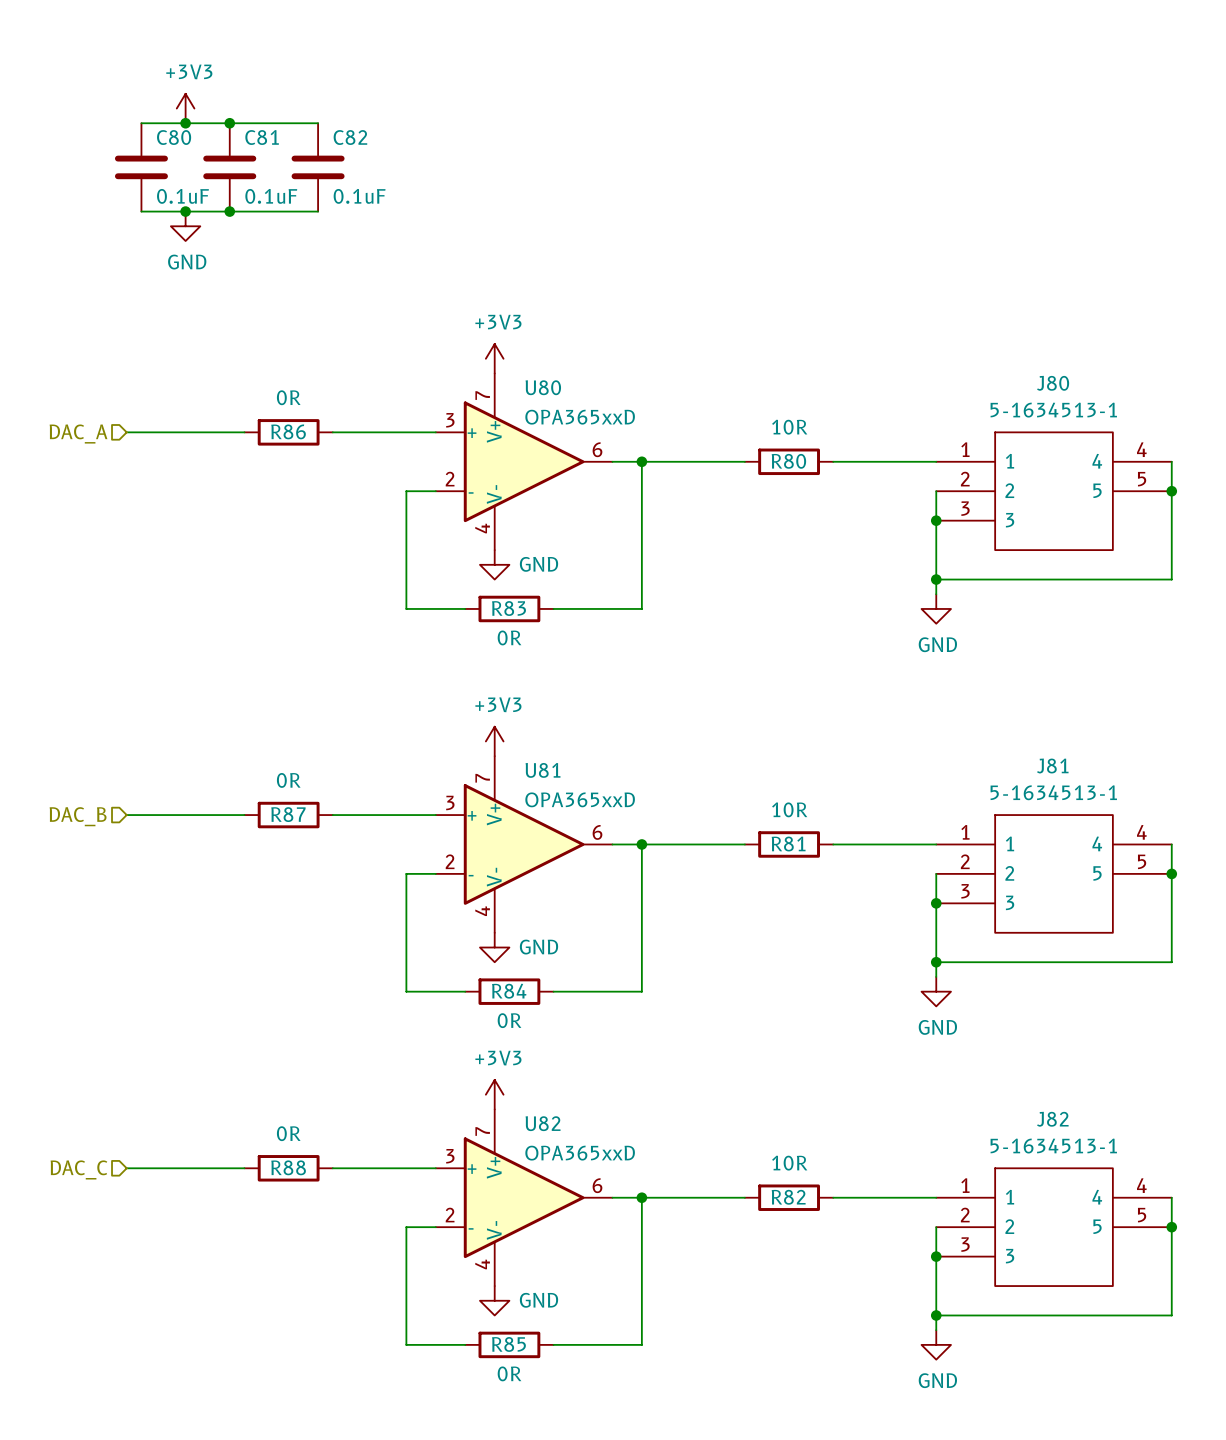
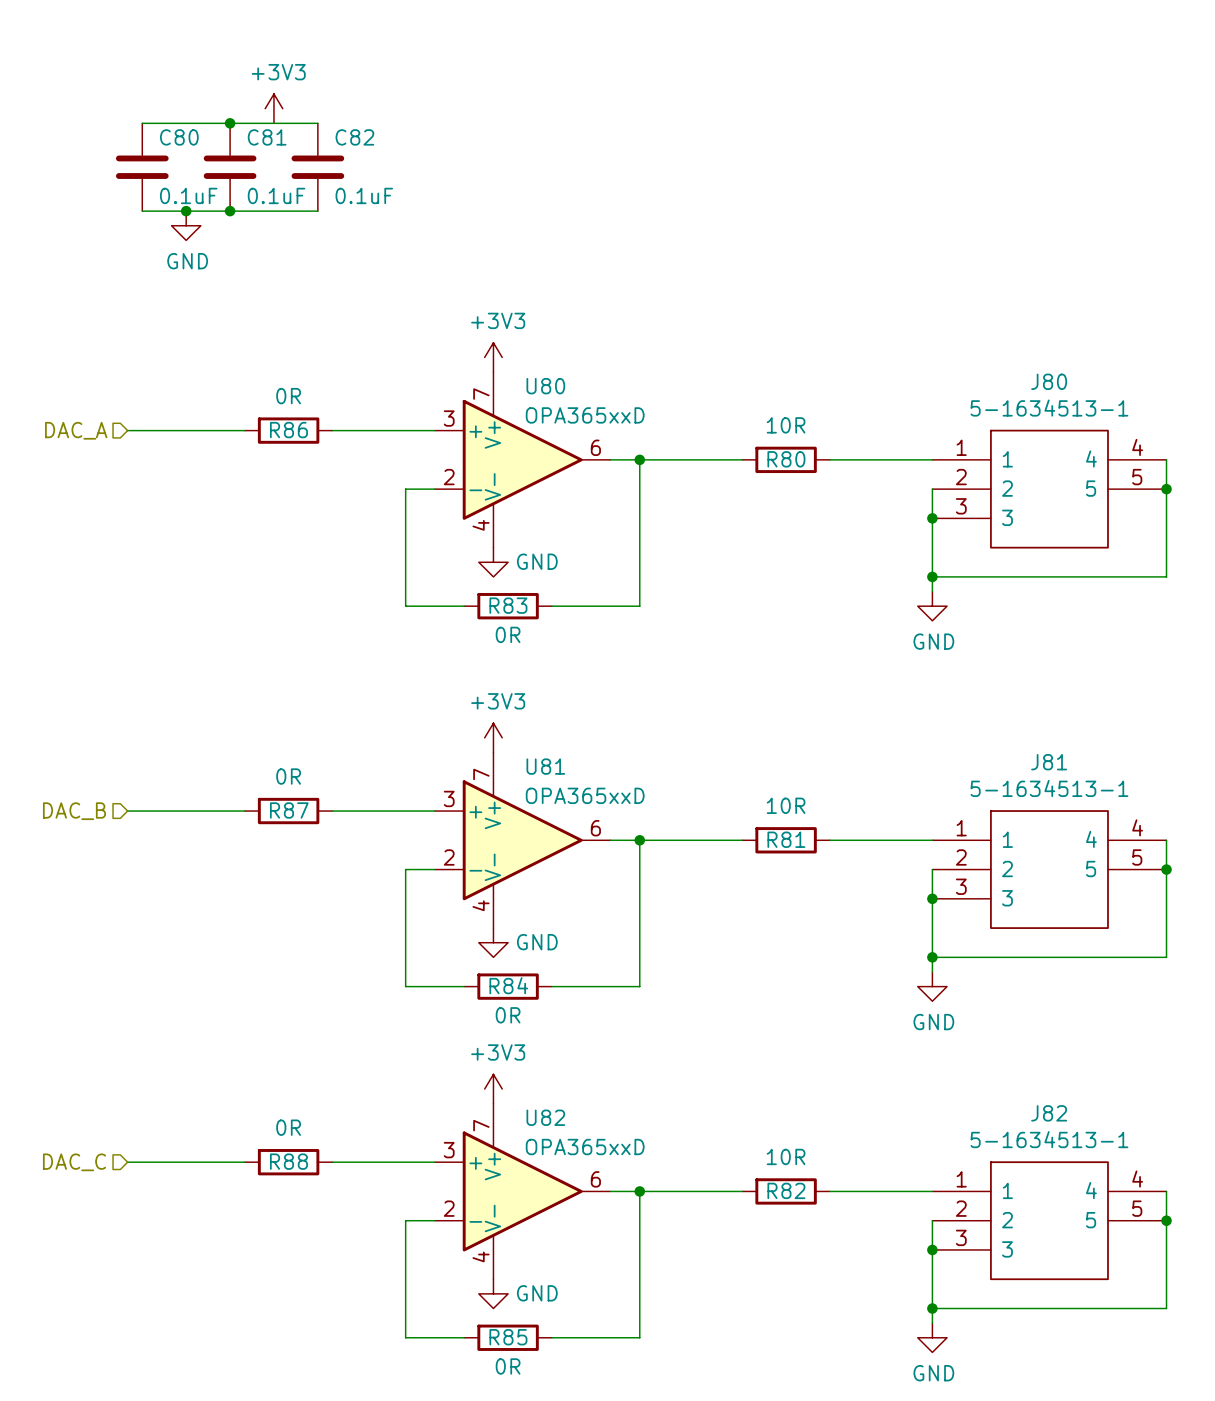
power symbol position: +3V3 (185, 108) -> +3V3 (273, 108)
junction: (185, 123) -> none

